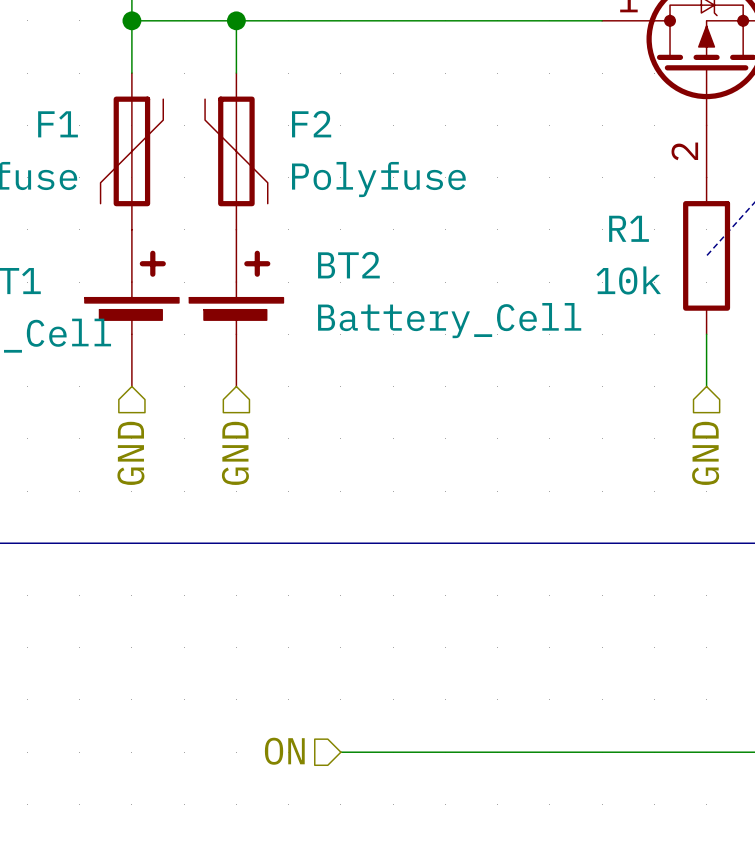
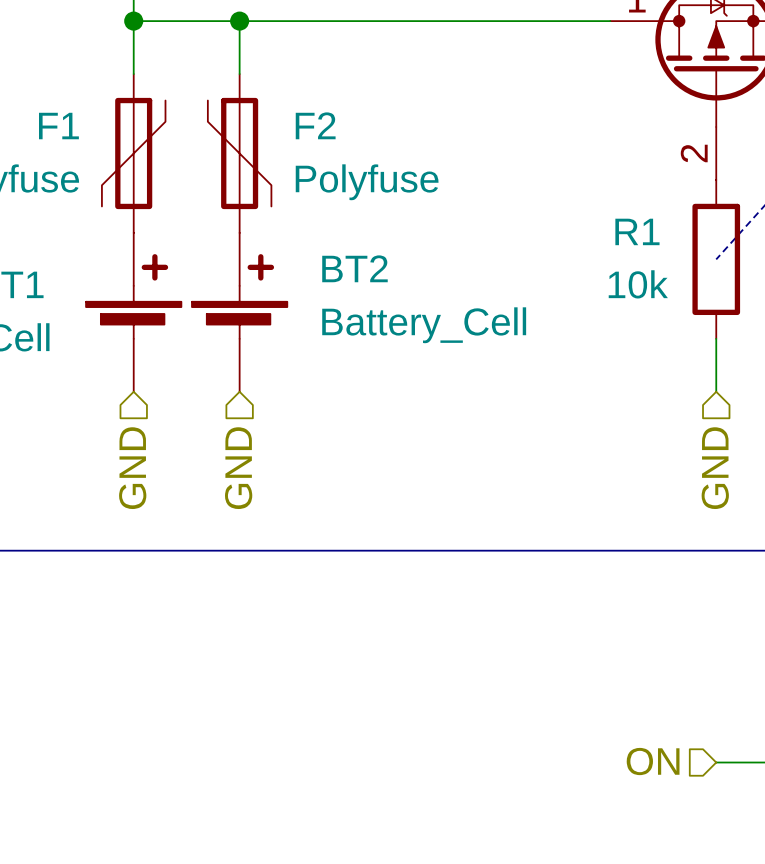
hierarchical label position: ON (284, 751) -> ON (653, 761)
wire: (340, 752) (706, 752) -> none

